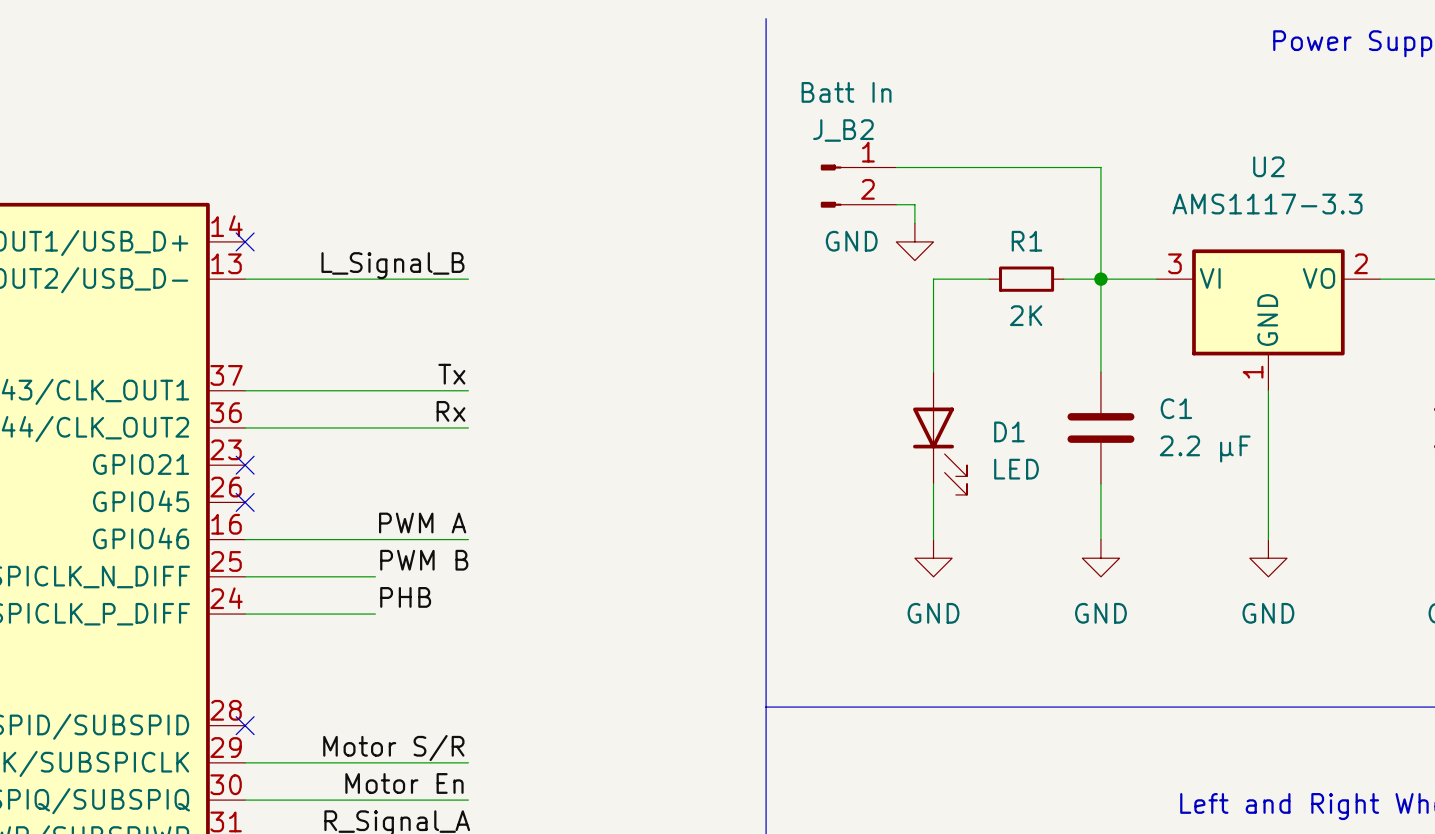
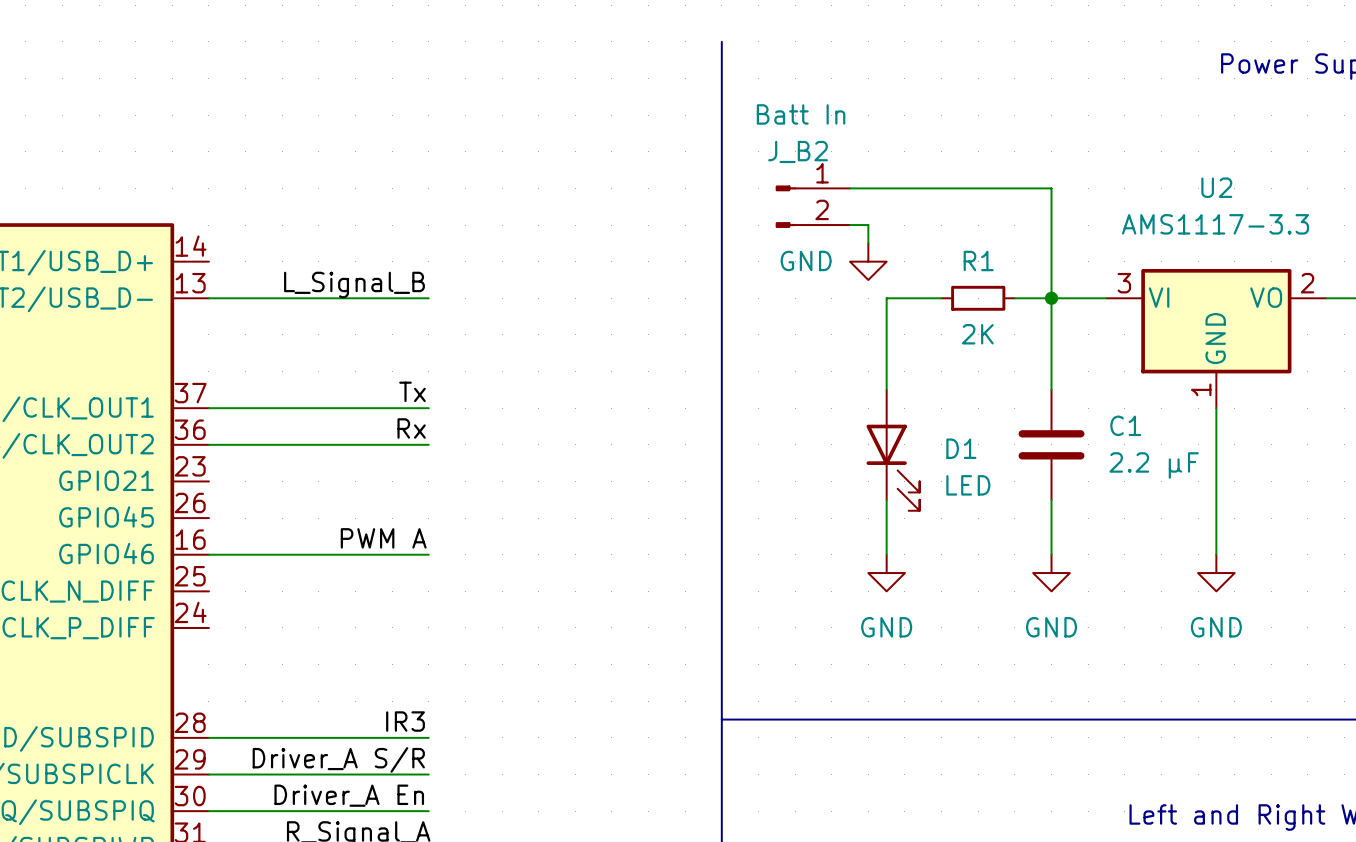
no-connect mark: (245, 241) -> none
no-connect mark: (245, 465) -> none
no-connect mark: (245, 502) -> none
label: PWM B (424, 560) -> none
wire: (245, 576) (375, 576) -> none
label: PHB (405, 597) -> none
wire: (245, 614) (375, 614) -> none
label: none -> IR3 (405, 721)
wire: none -> (208, 737) (428, 737)
no-connect mark: (245, 725) -> none
label: Motor S/R (393, 748) -> Driver_A S/R (338, 759)
label: Motor En (404, 783) -> Driver_A En (349, 795)

